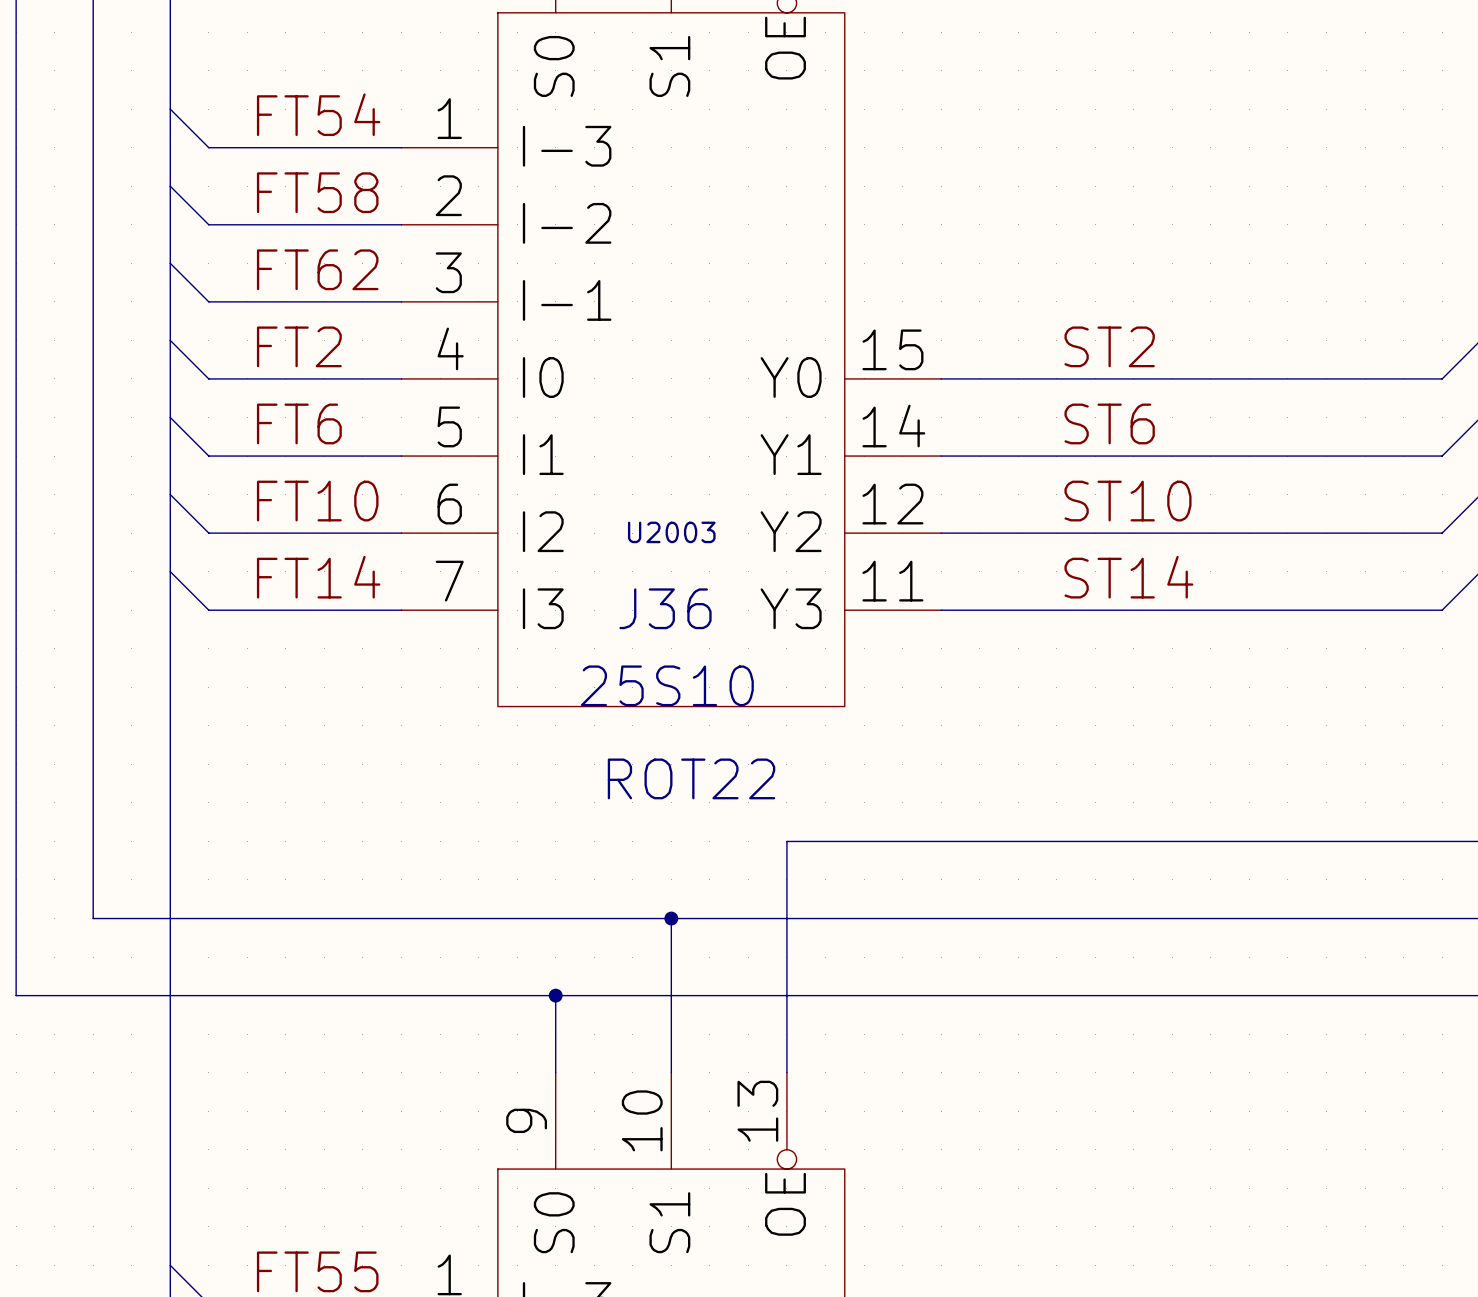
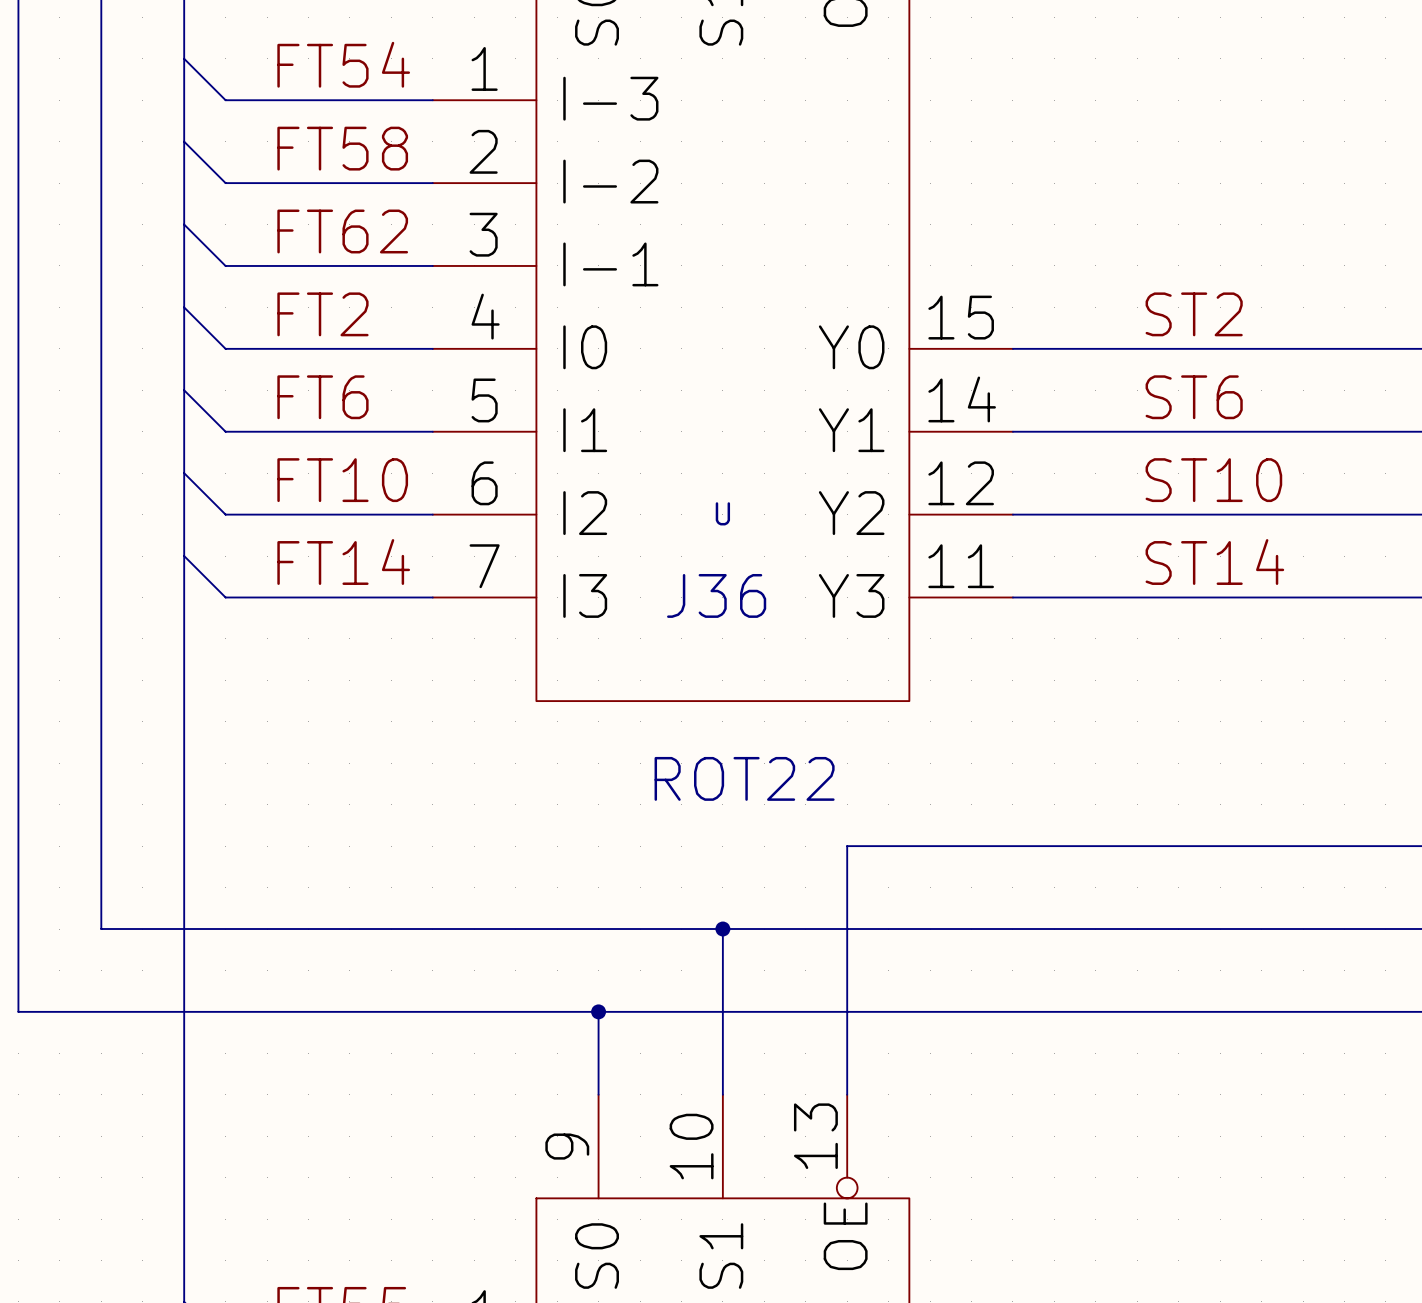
U2003 name: U2003 (671, 532) -> U (722, 513)
U2003 value: 25S10 (667, 685) -> none

